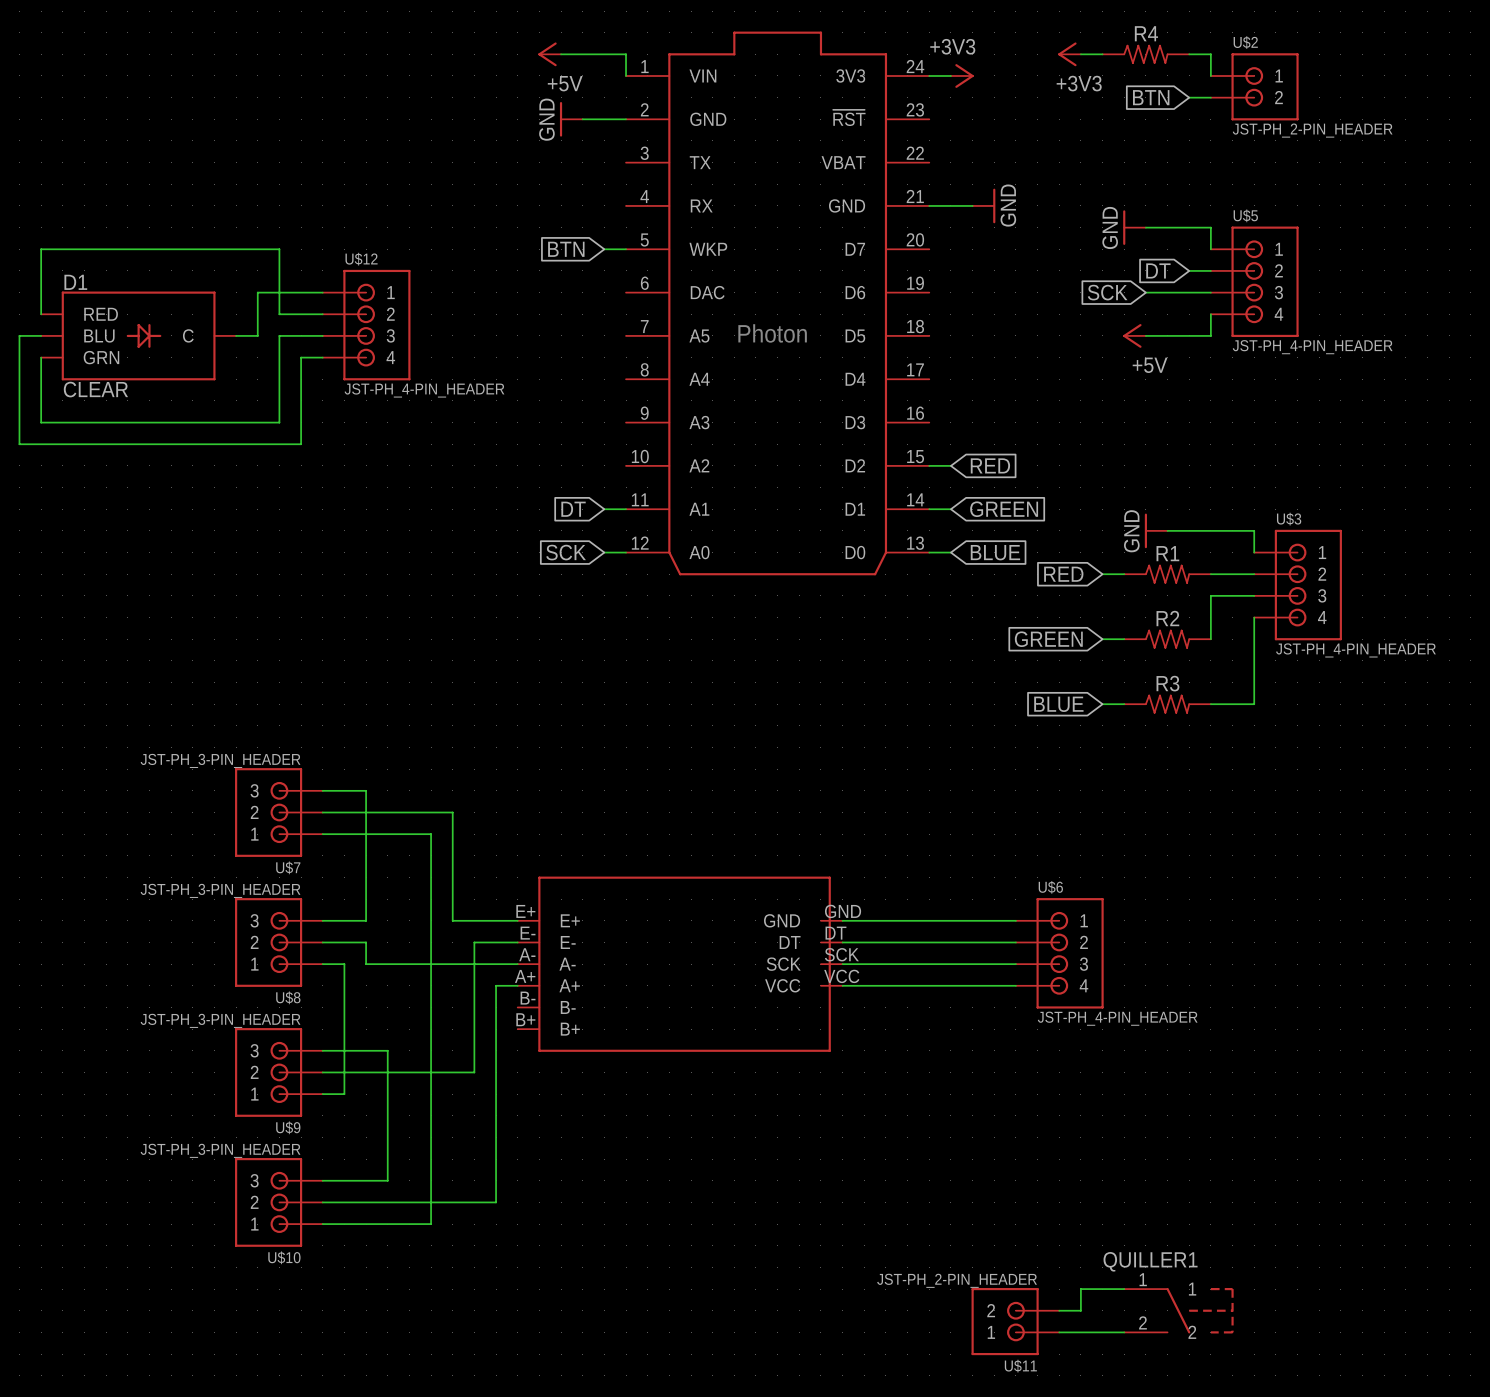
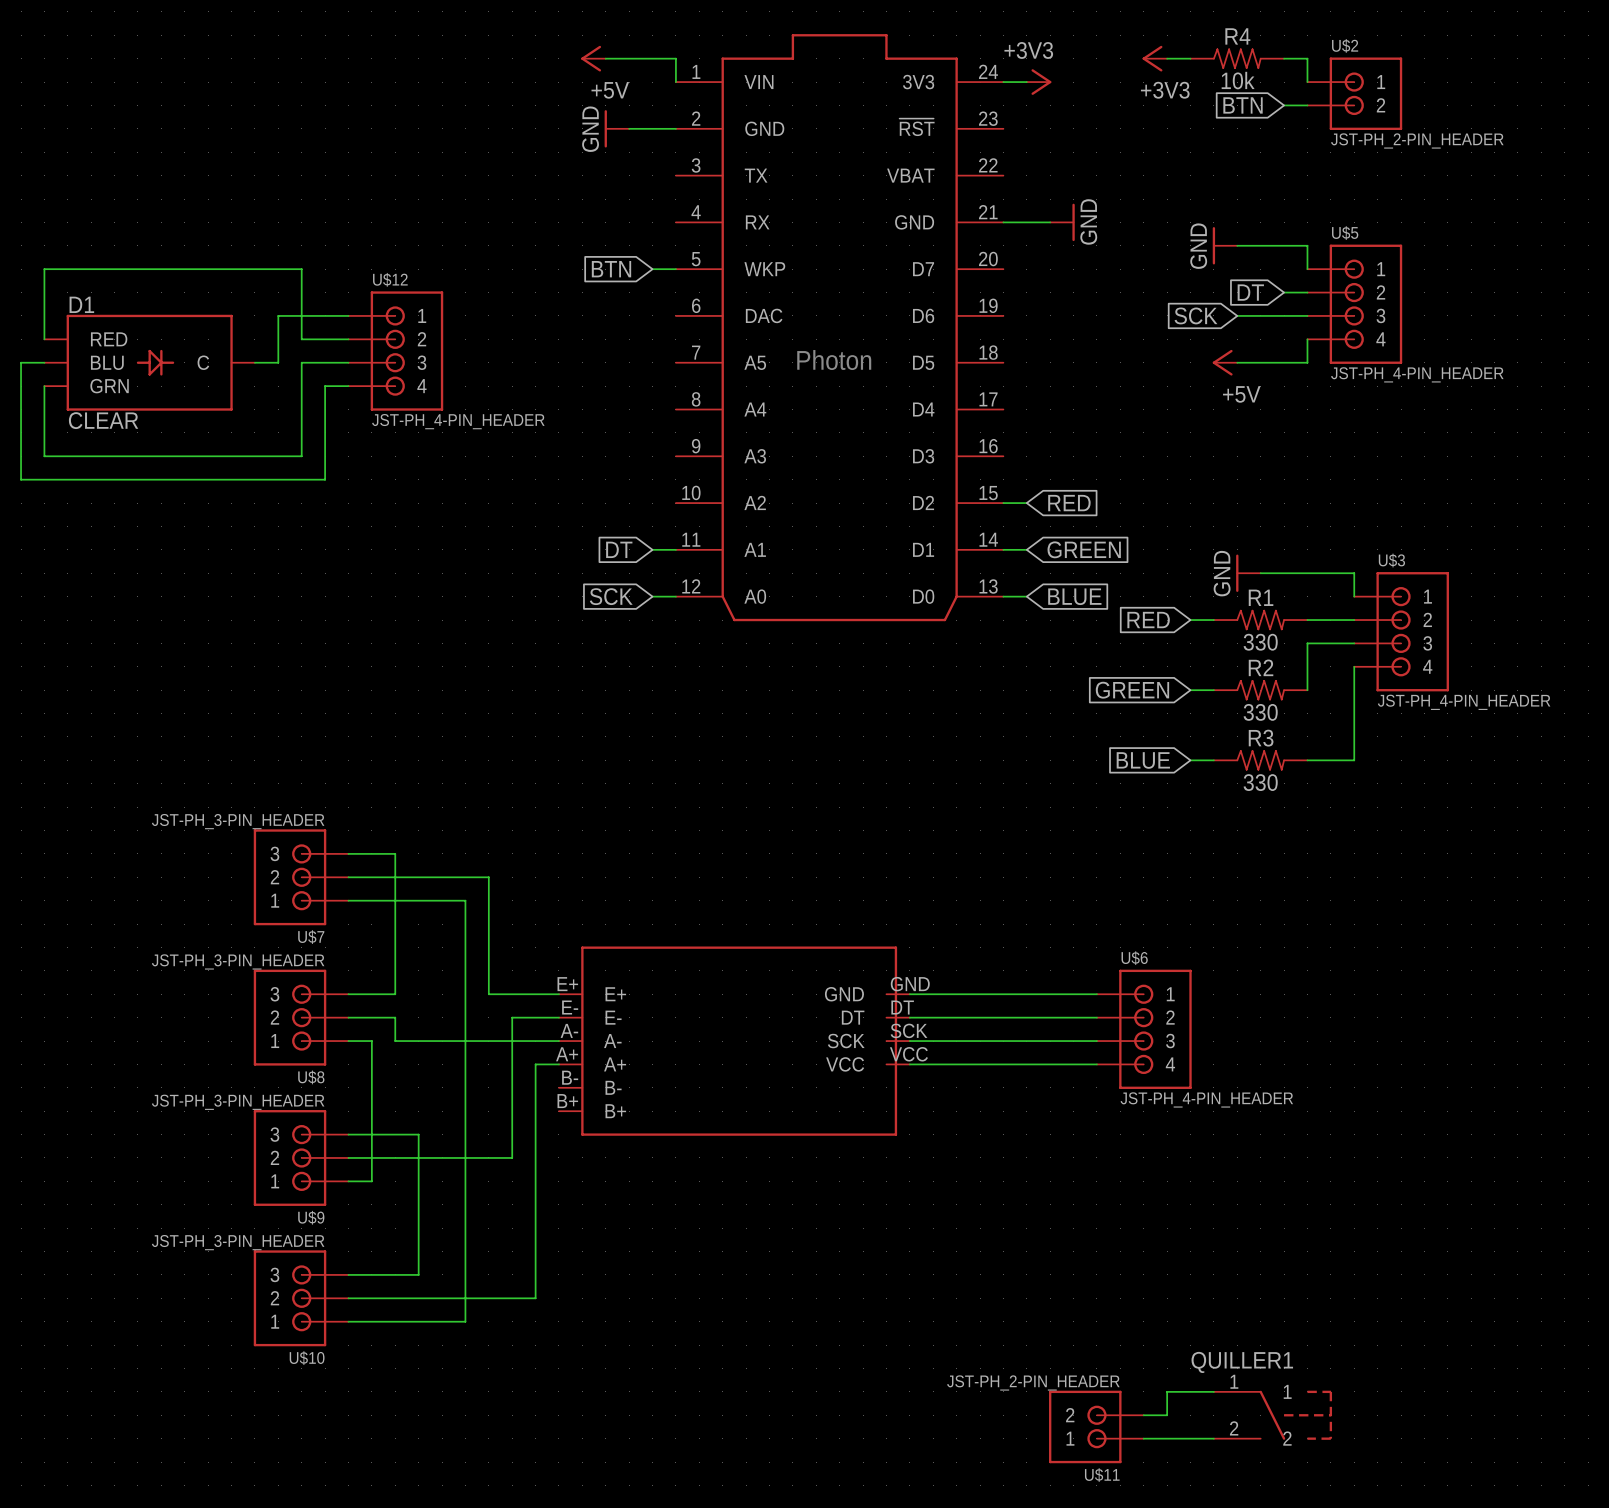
R4 value: none -> 10k (1238, 80)
R1 value: none -> 330 (1260, 642)
R2 value: none -> 330 (1260, 712)
R3 value: none -> 330 (1260, 782)

